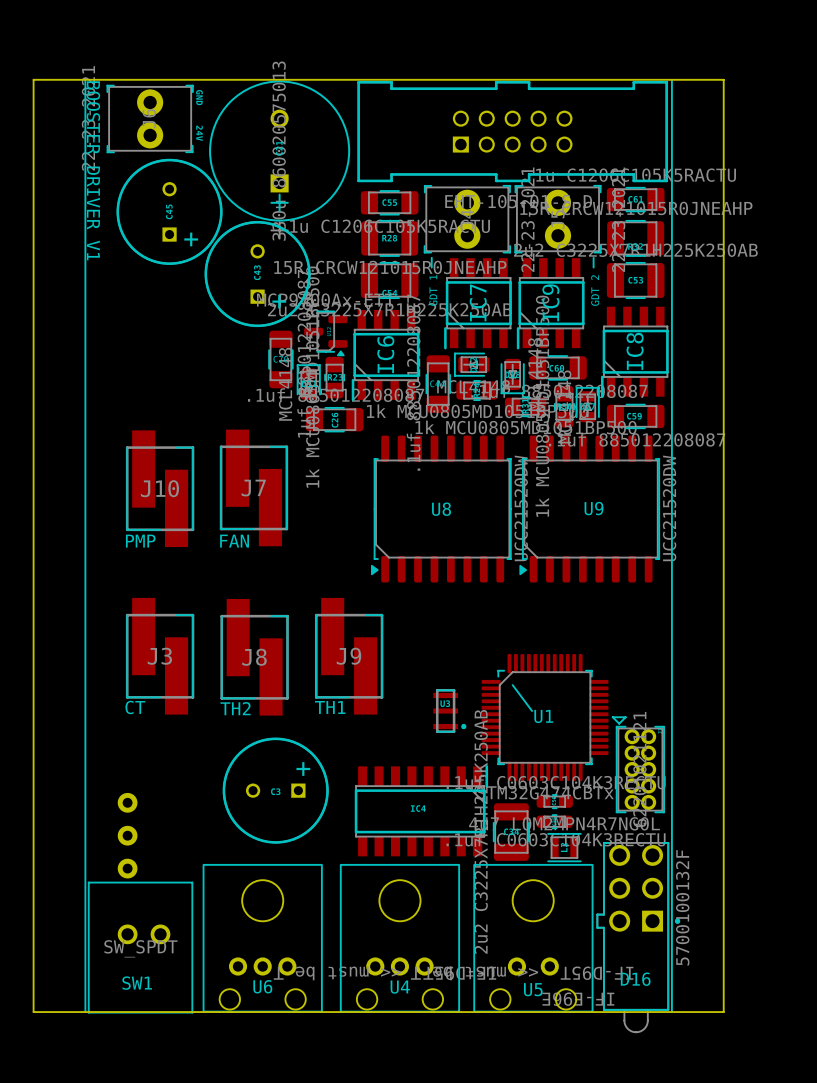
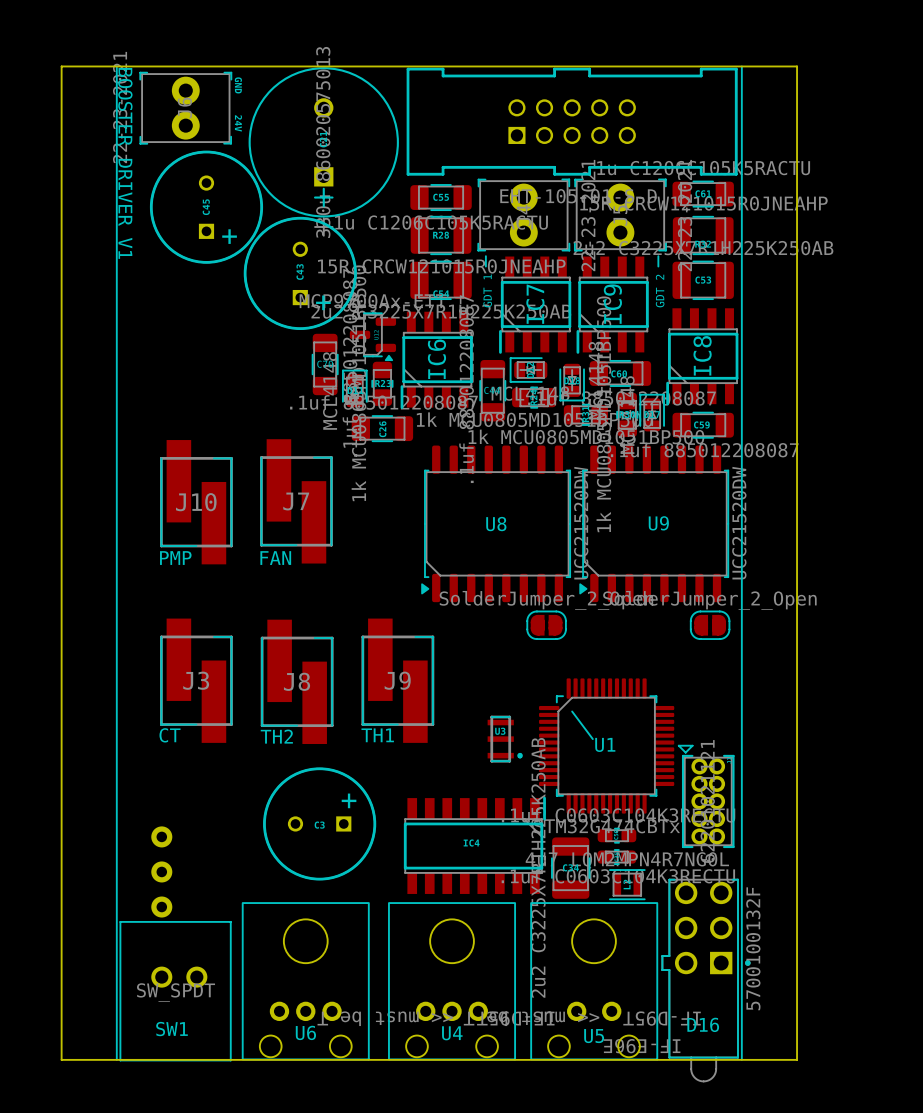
part: none -> SolderJumper_2_Open (546, 625)
part: none -> SolderJumper_2_Open (710, 625)

